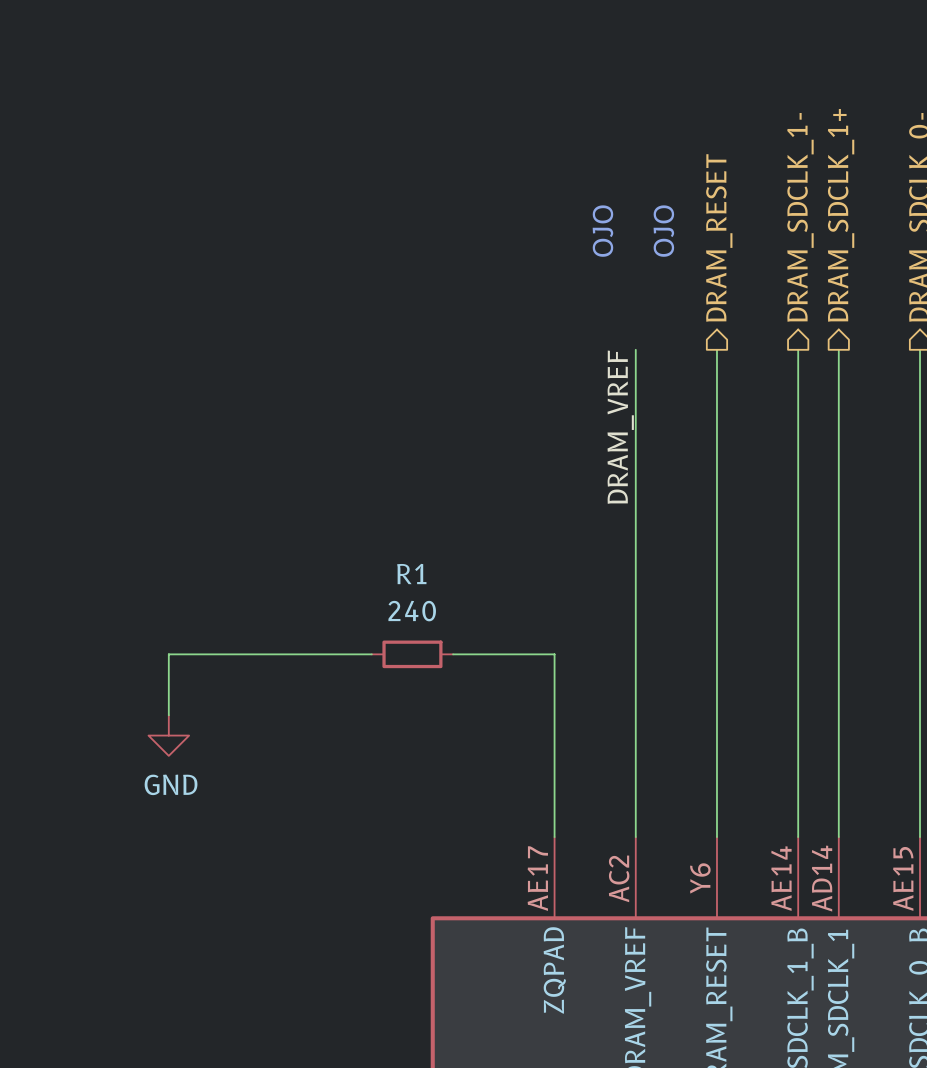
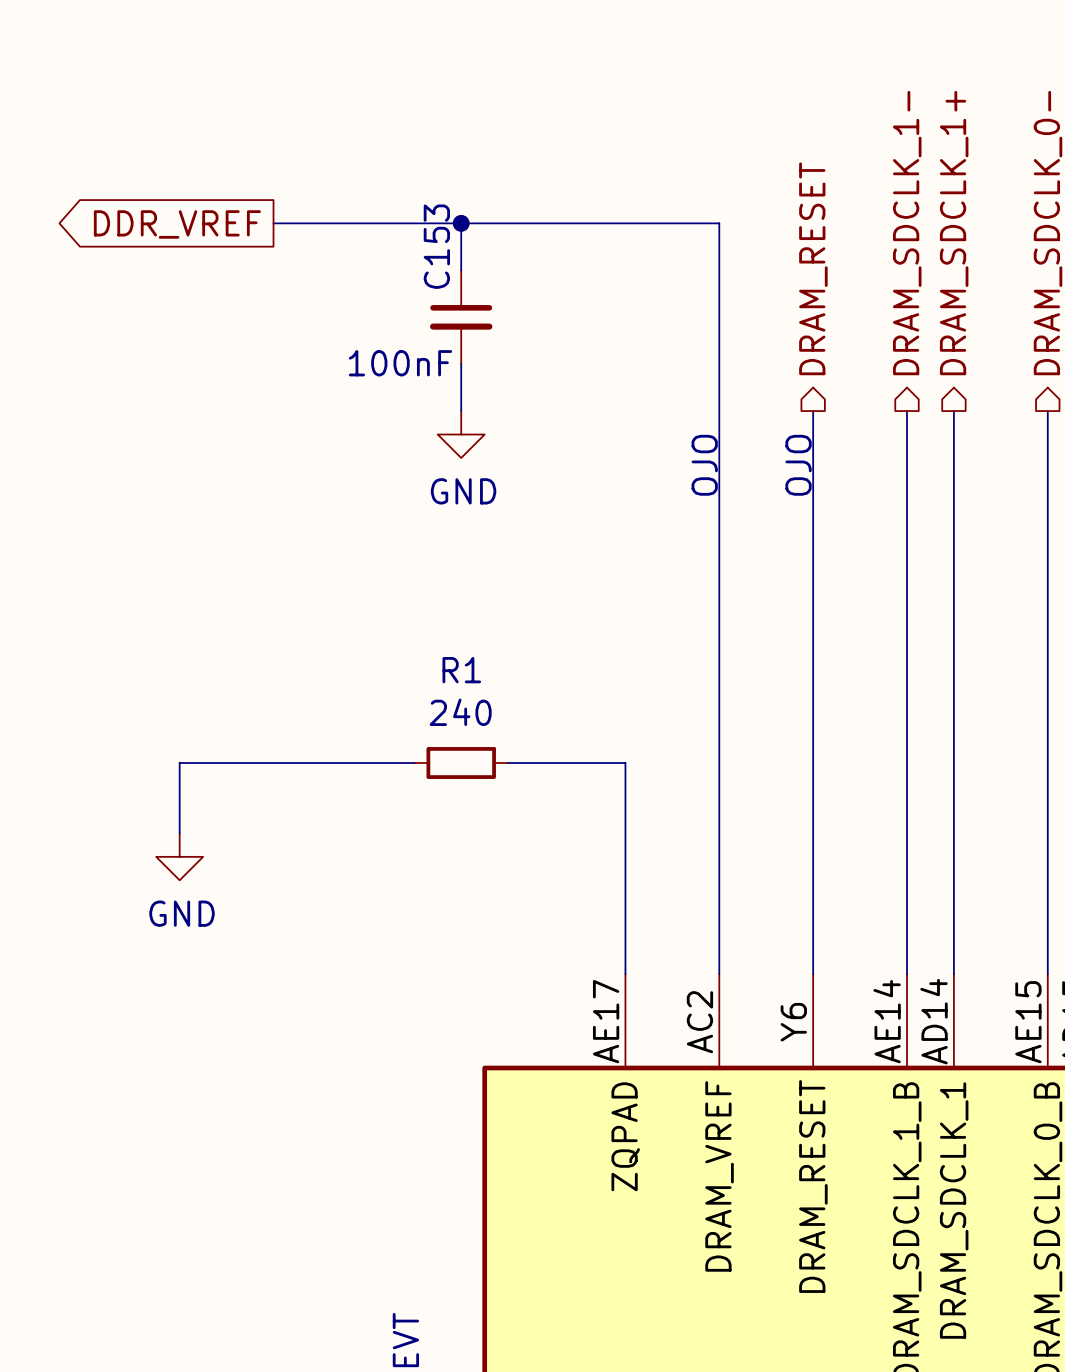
wire: none -> (273, 223) (719, 223) (719, 411)
wire: none -> (461, 223) (461, 270)
junction: none -> (461, 223)
global label: none -> DDR_VREF (177, 224)
text: OJO (602, 231) -> none
text: OJO (663, 231) -> none
C153: none -> 100nF (461, 317)
wire: none -> (461, 364) (461, 411)
power symbol: none -> GND (461, 434)
text: none -> OJO (704, 465)
text: none -> OJO (798, 465)
label: DRAM_VREF (620, 427) -> none

